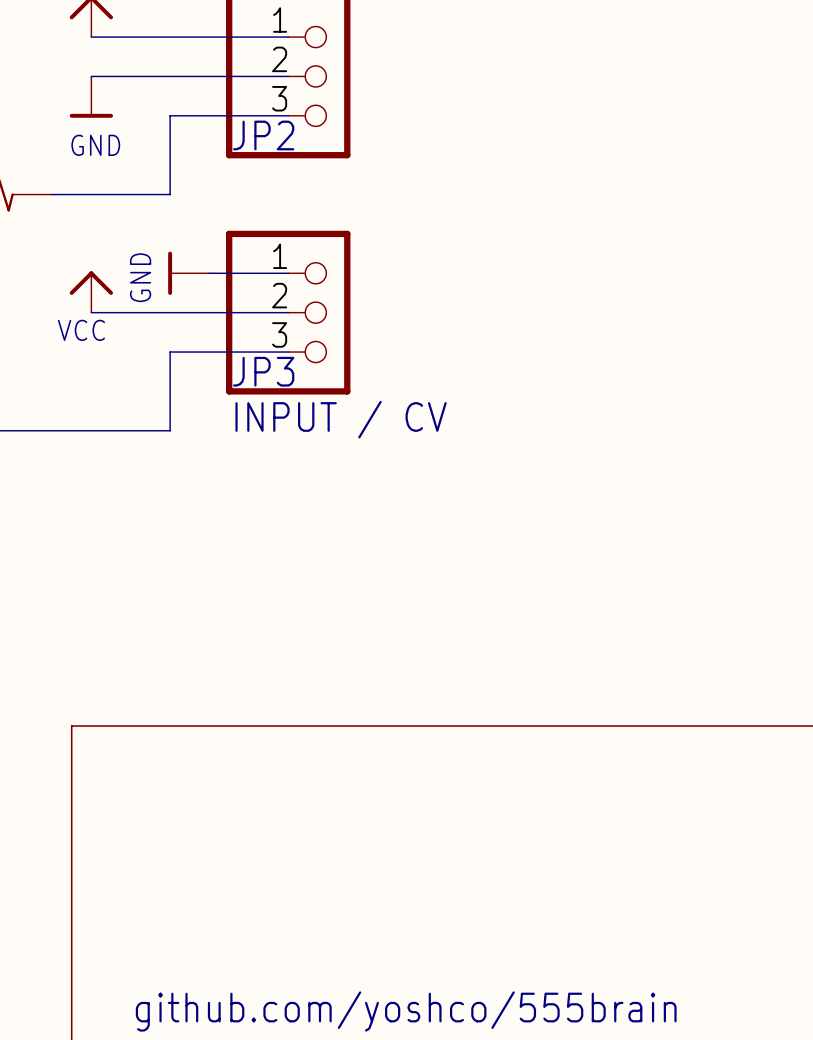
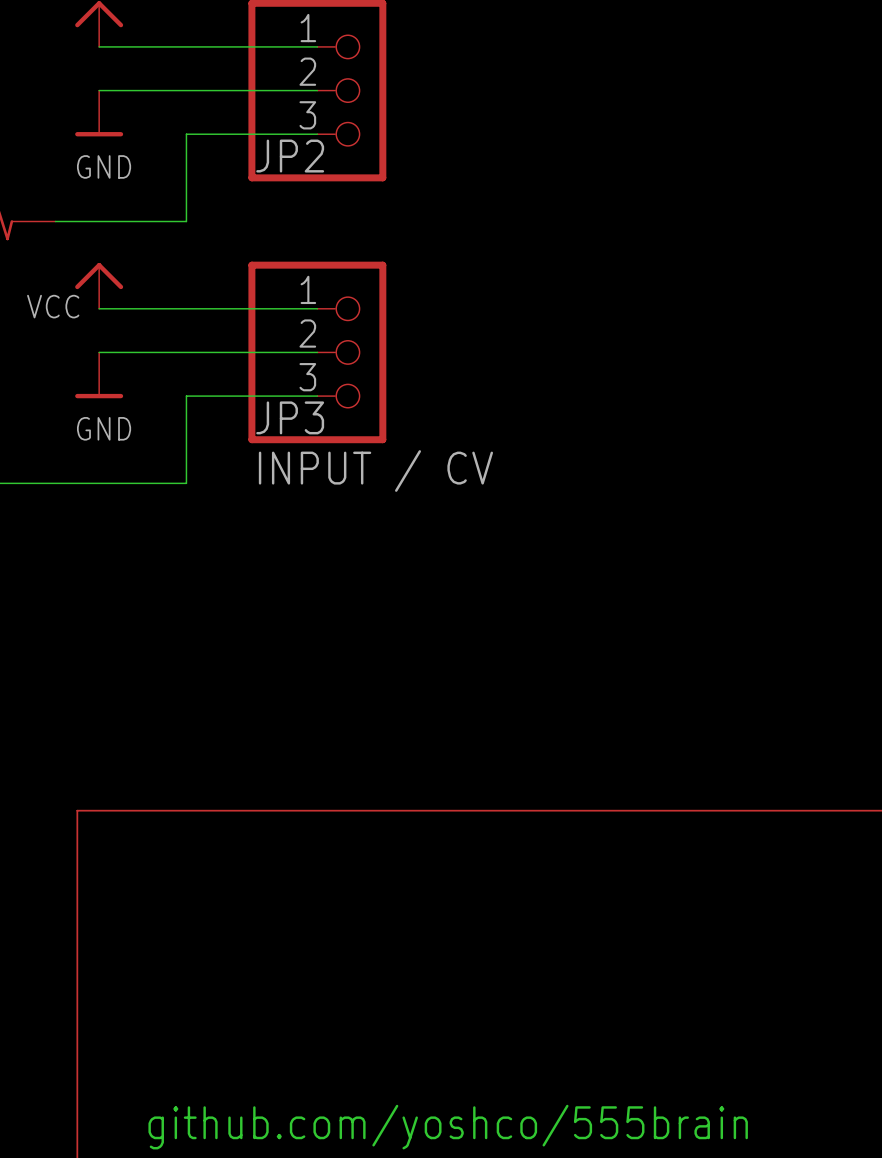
wire: none -> (99, 308) (230, 308)
power symbol rotation: 0° (170, 273) -> 90° counterclockwise (99, 396)
power symbol position: GND (188, 273) -> GND (99, 375)
power symbol position: VCC (91, 291) -> VCC (99, 285)
power symbol text position: VCC (81, 330) -> VCC (53, 306)

